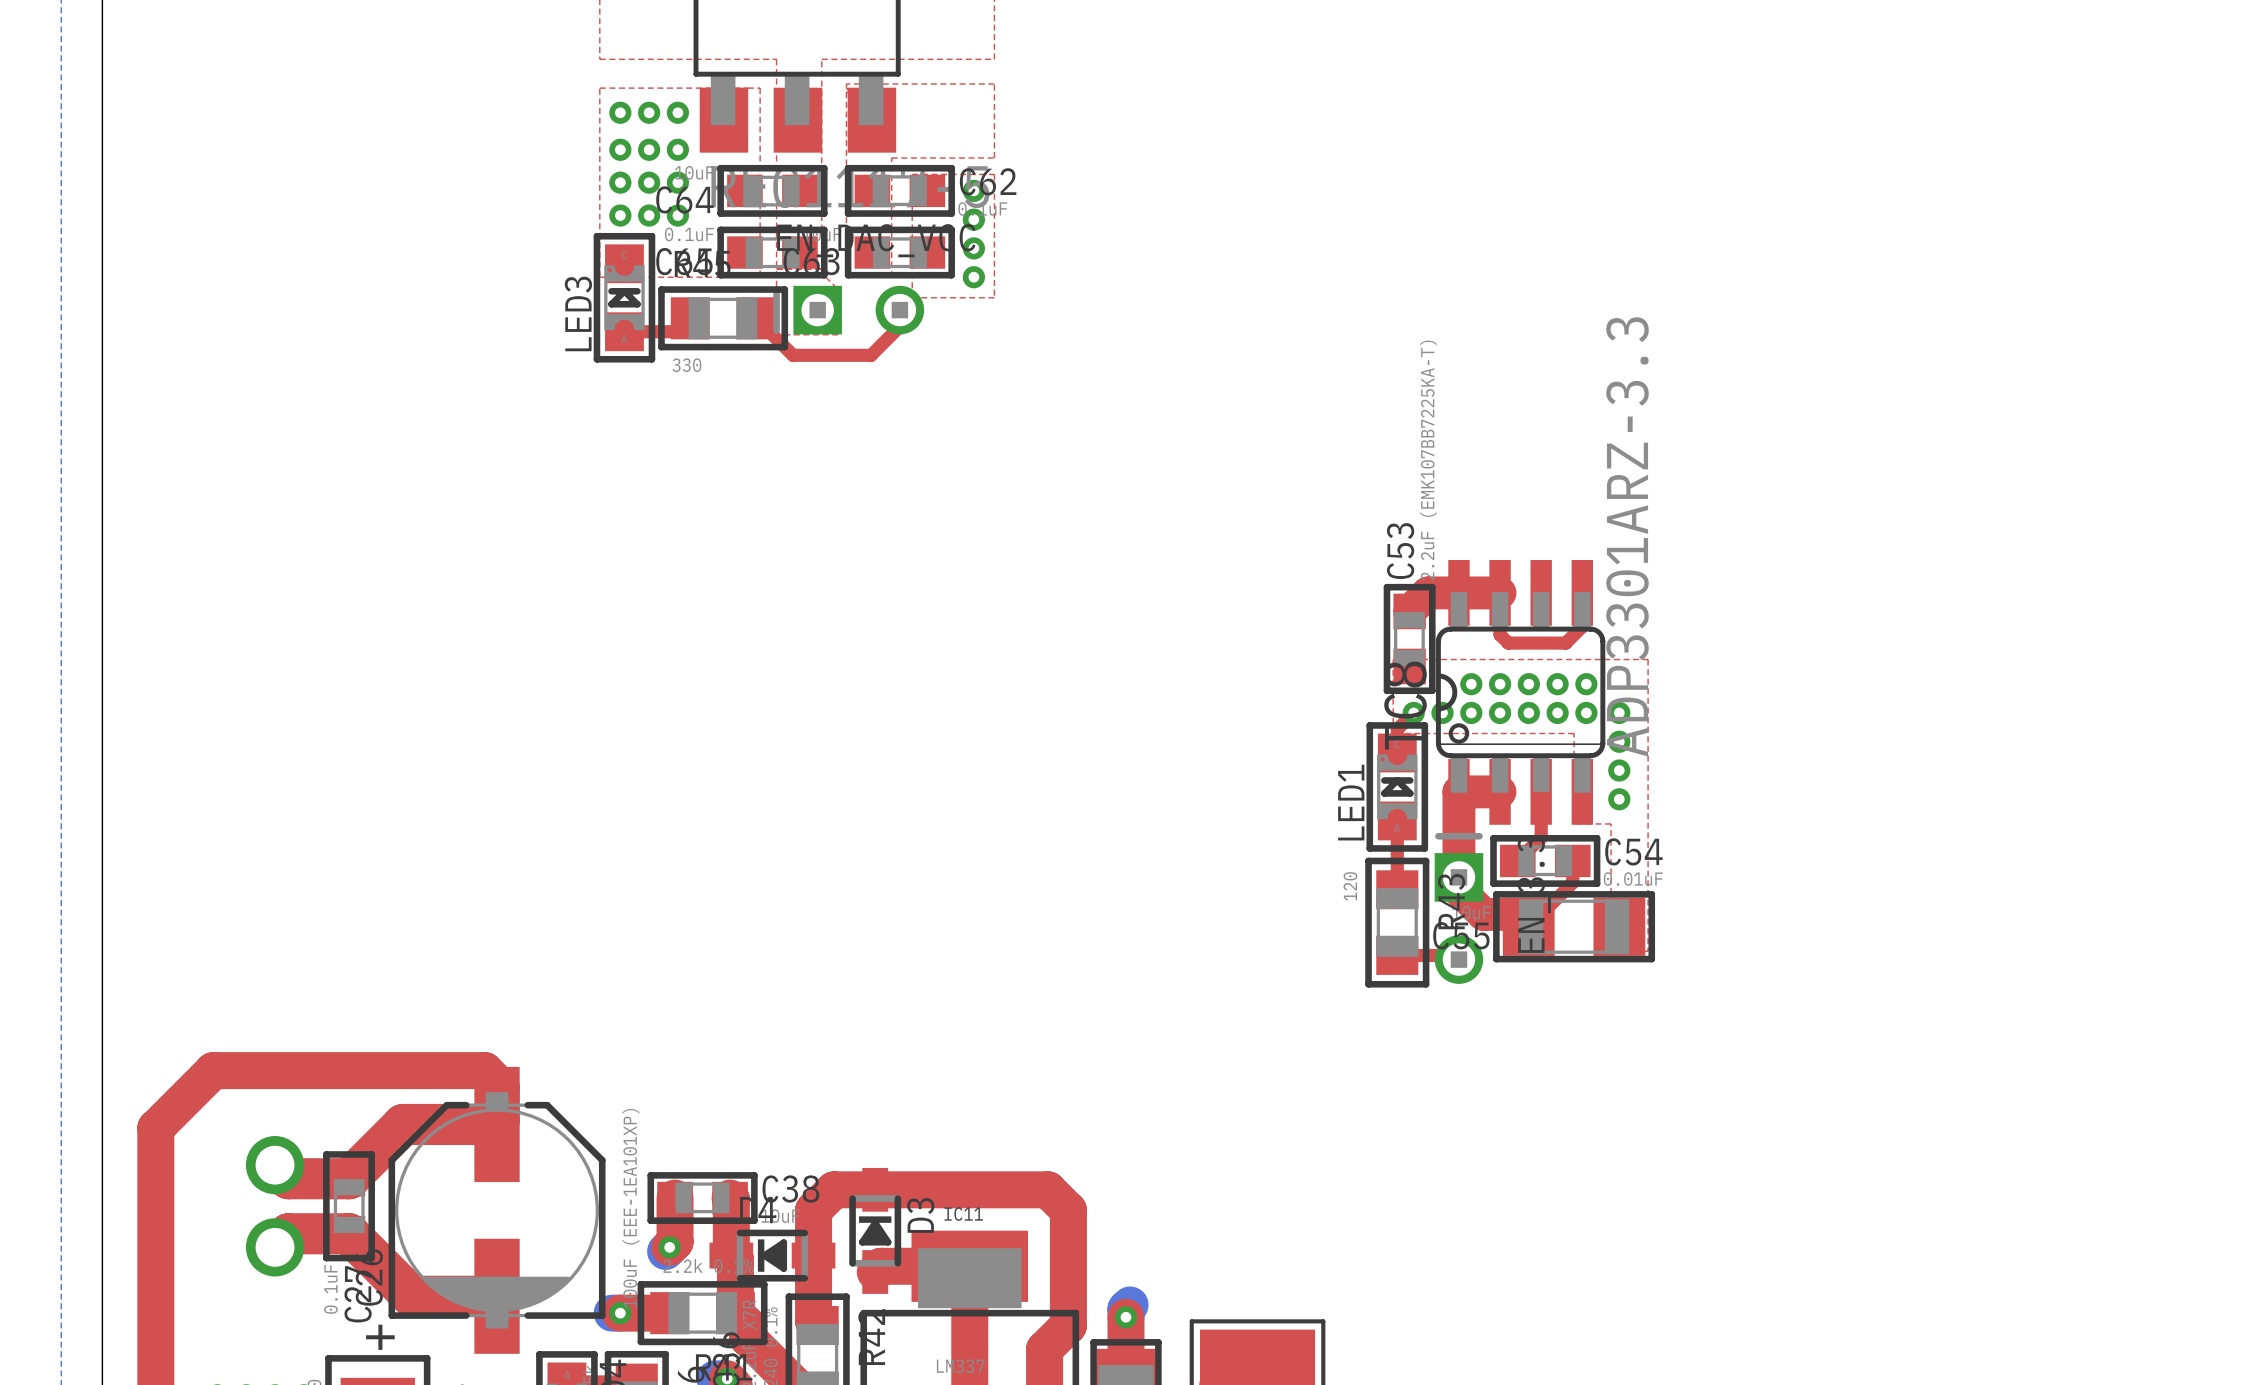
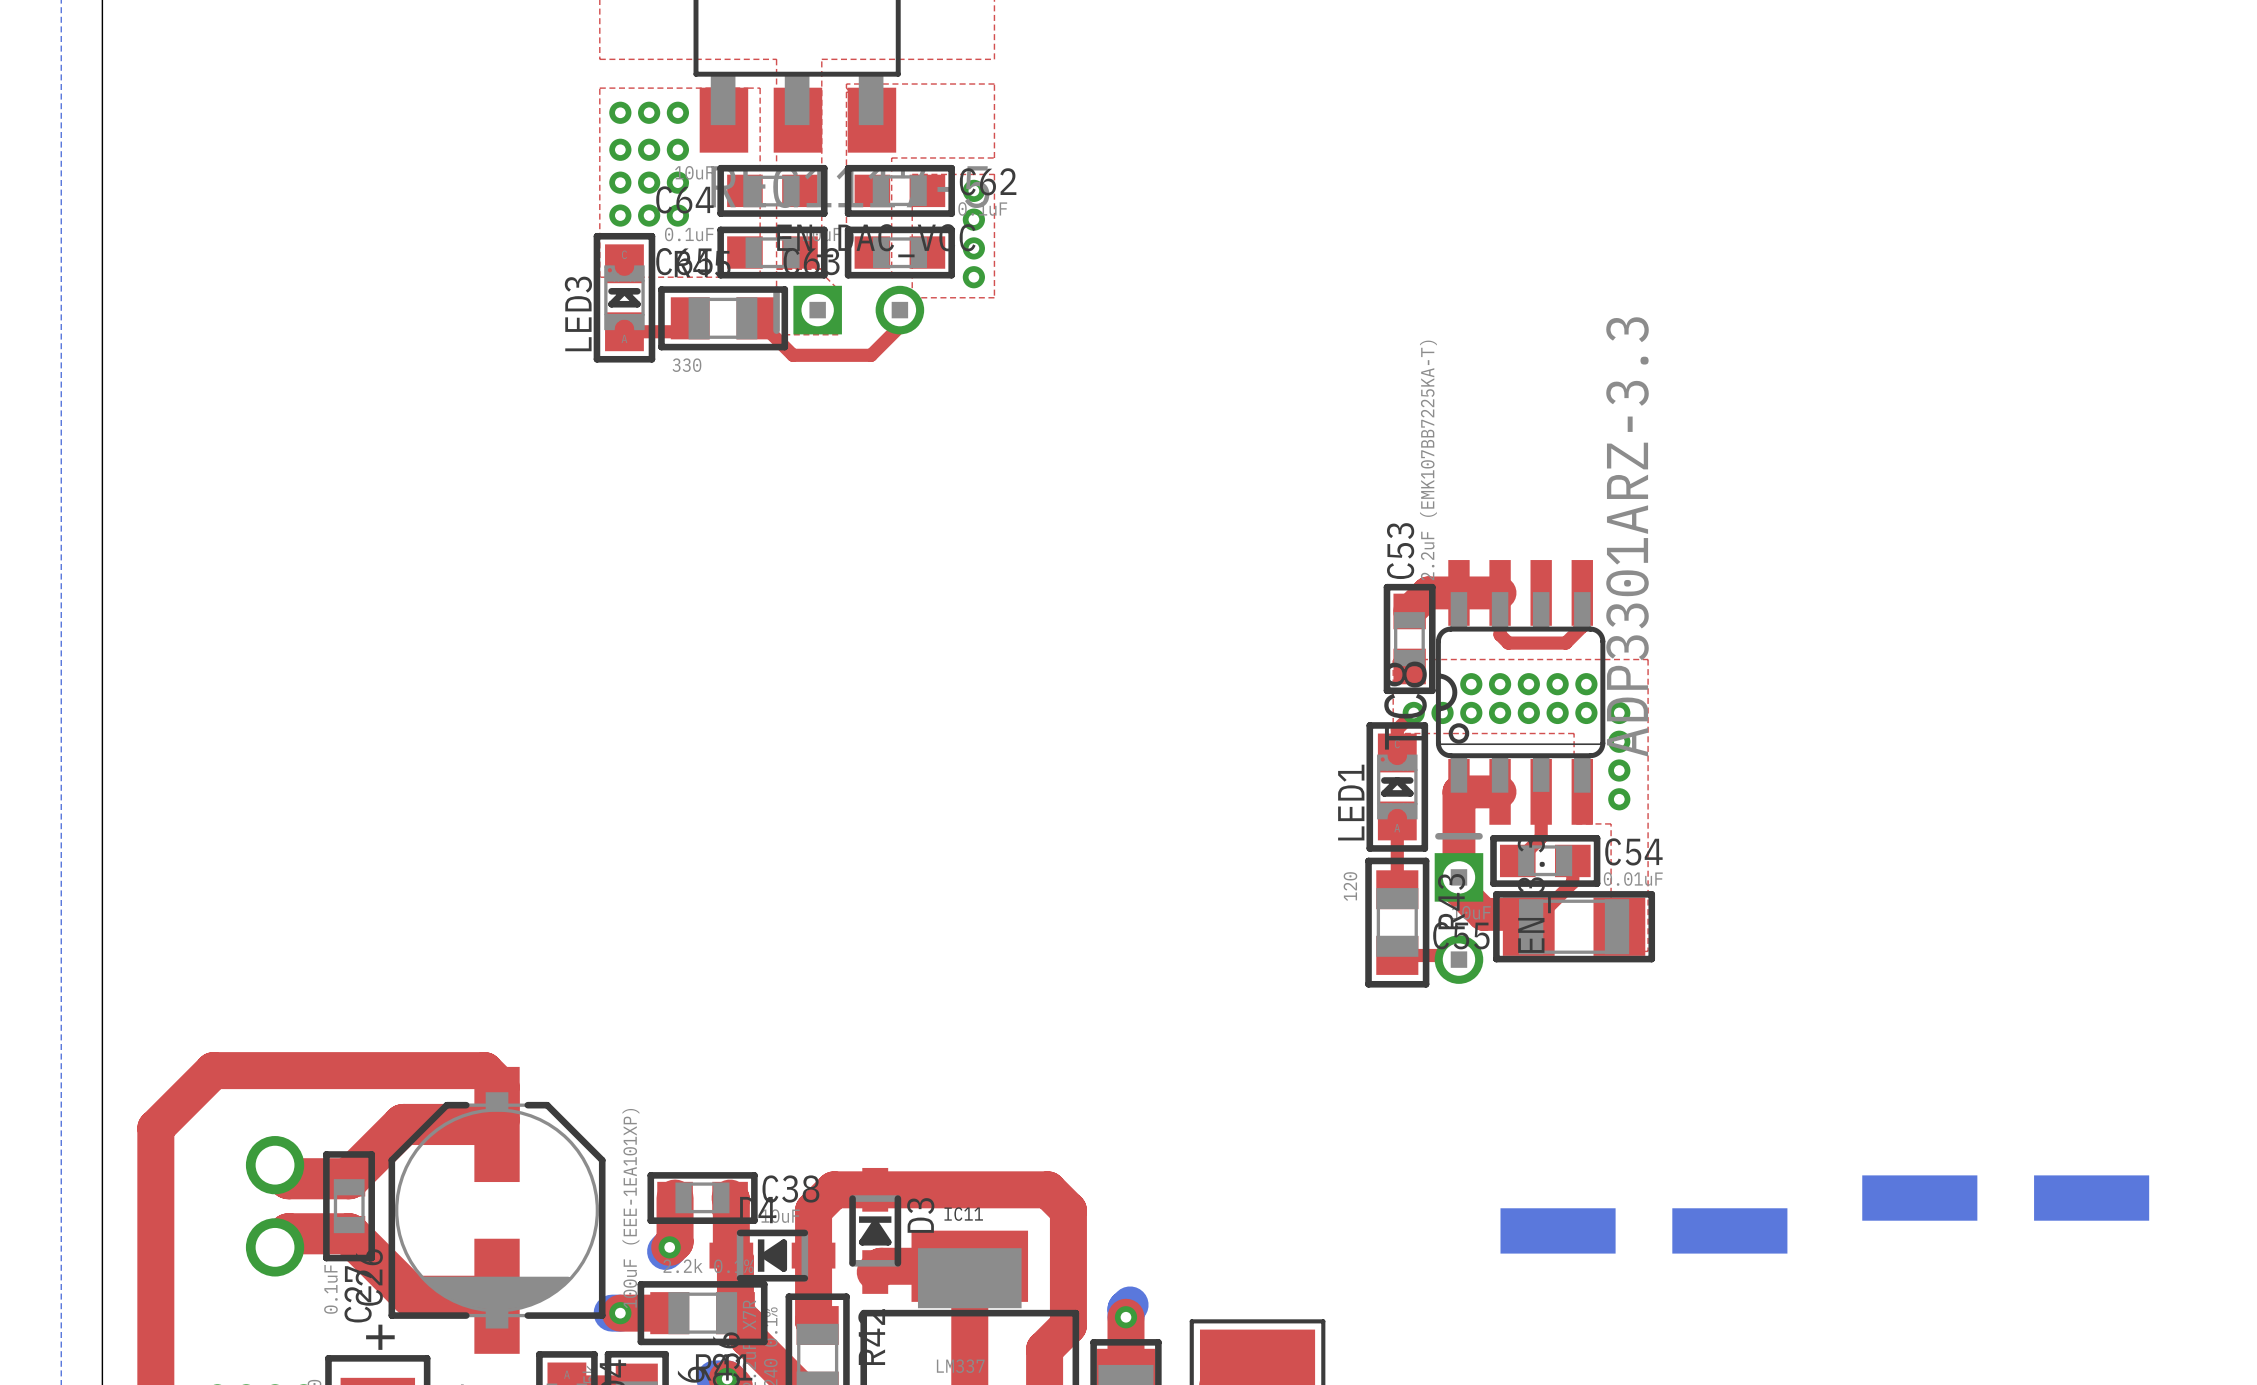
part: none -> (2005, 1198)
part: none -> (1643, 1230)

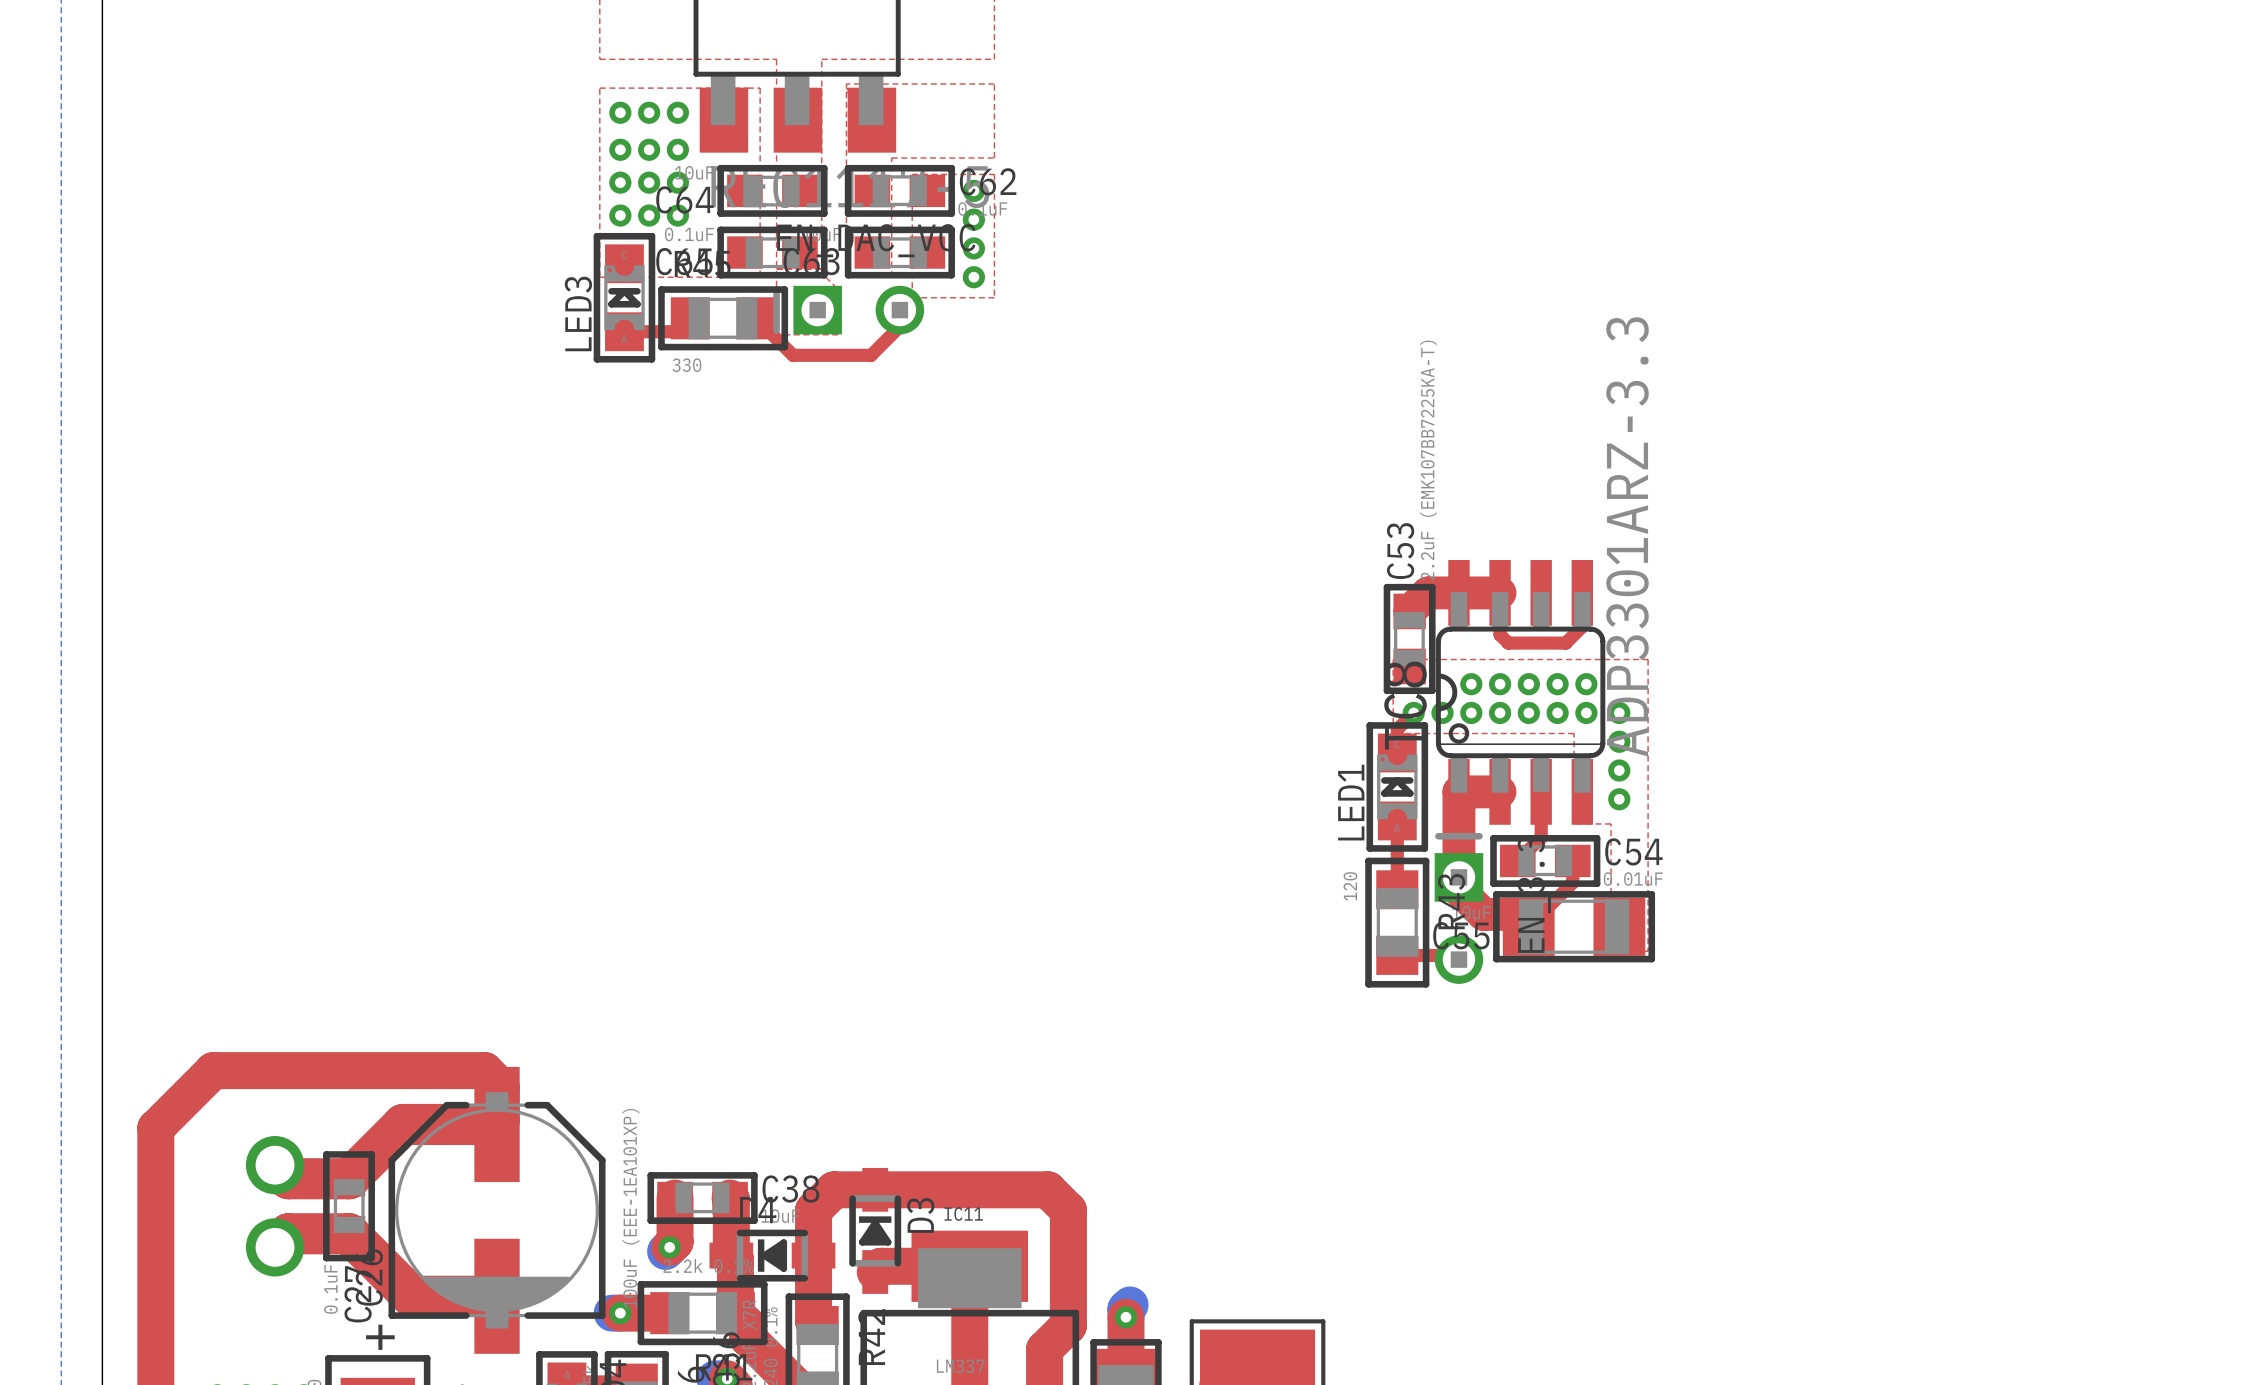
part: (2005, 1198) -> none
part: (1643, 1230) -> none

